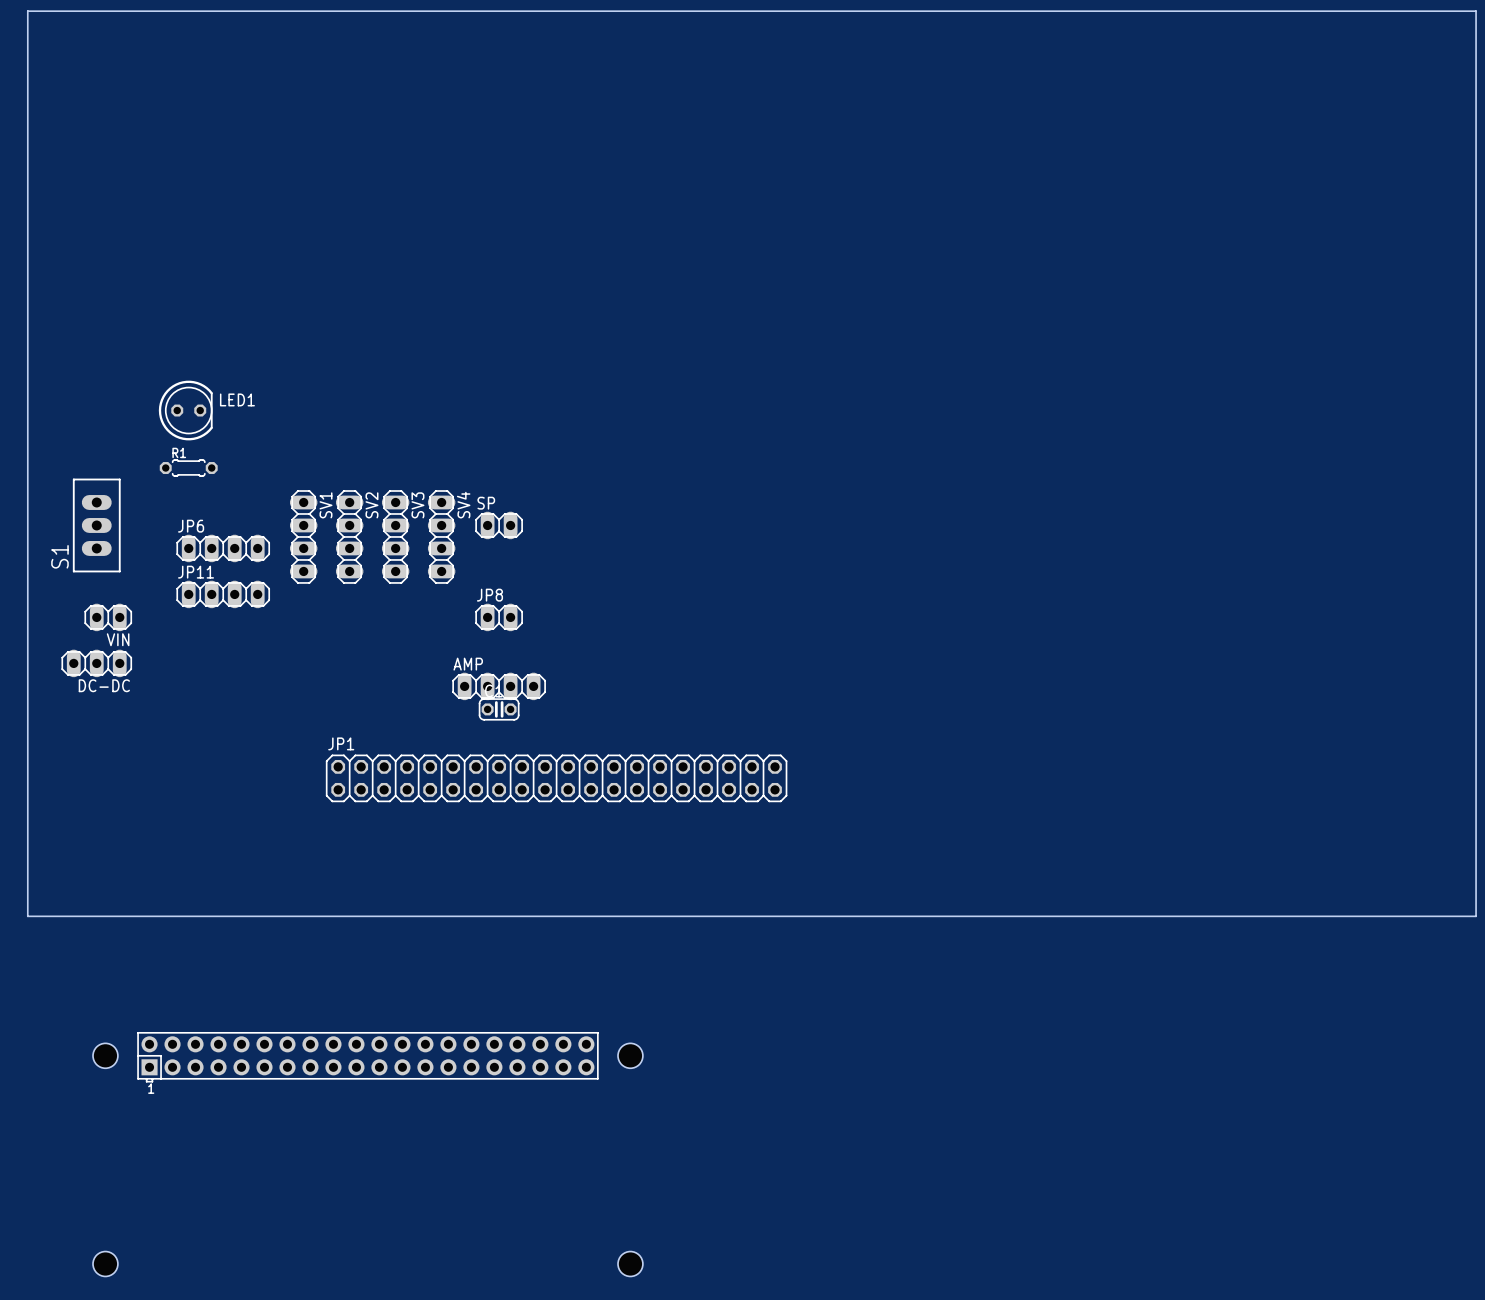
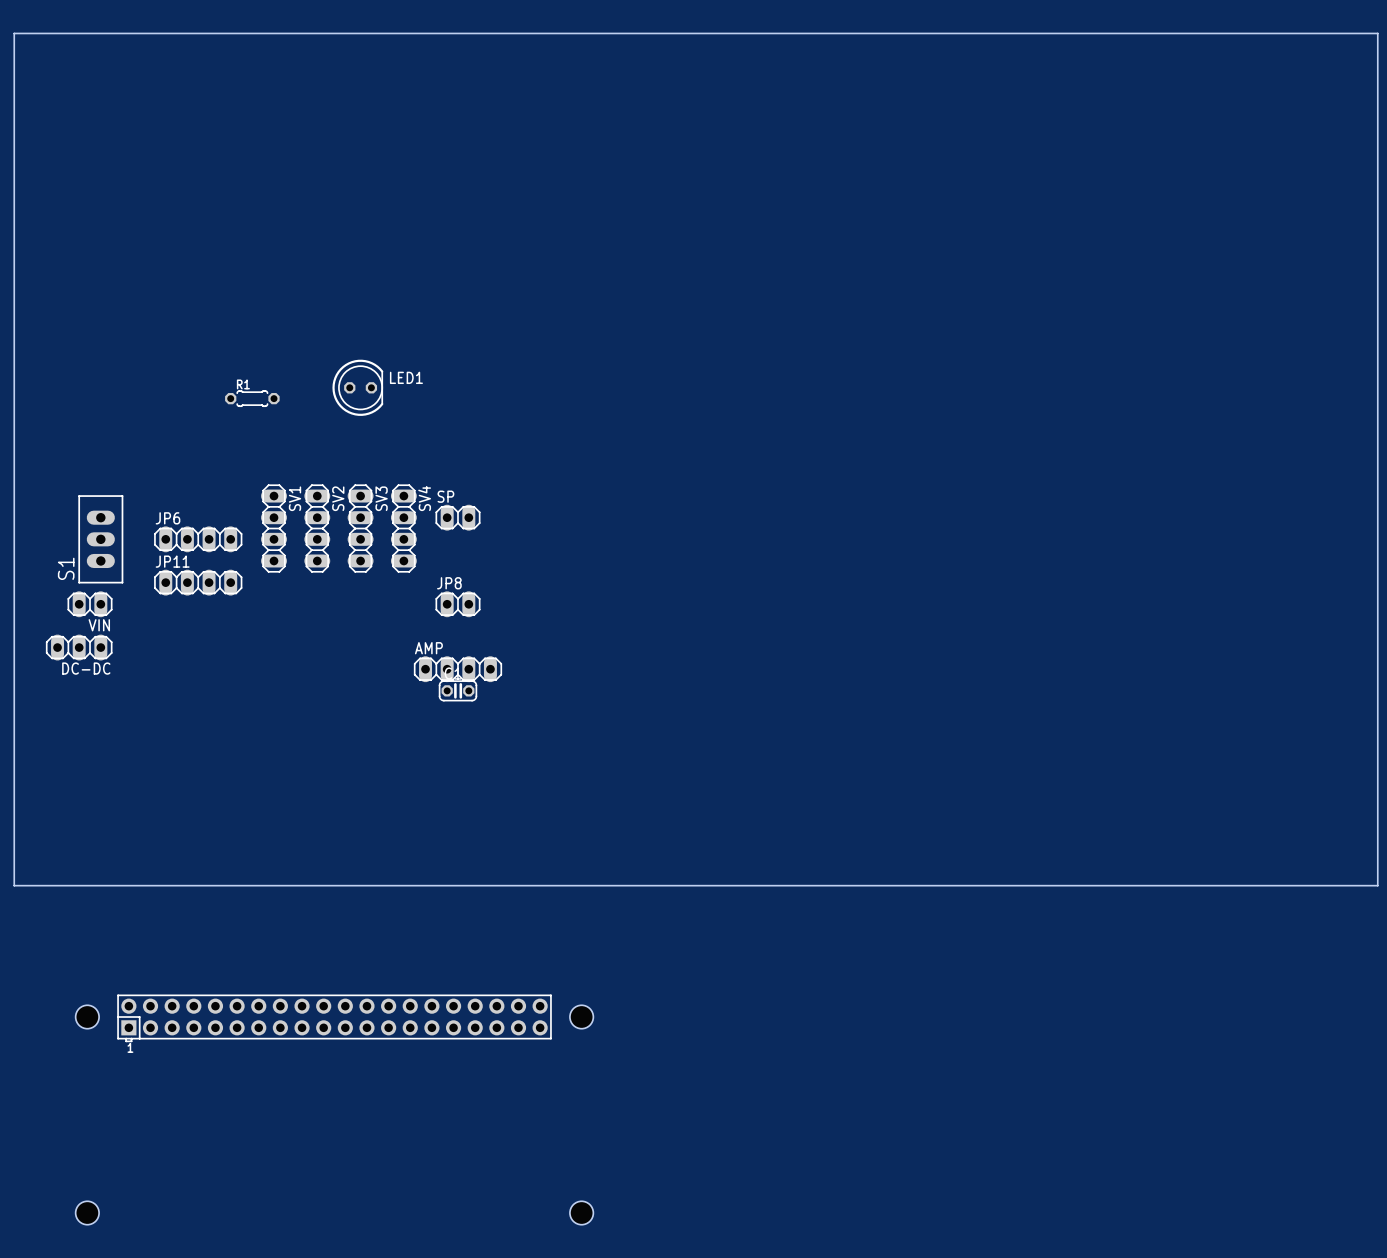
LED1 position: (185, 410) -> (357, 387)
R1 position: (188, 468) -> (252, 398)
S1 position: (96, 525) -> (100, 539)
JP1: (556, 778) -> none

